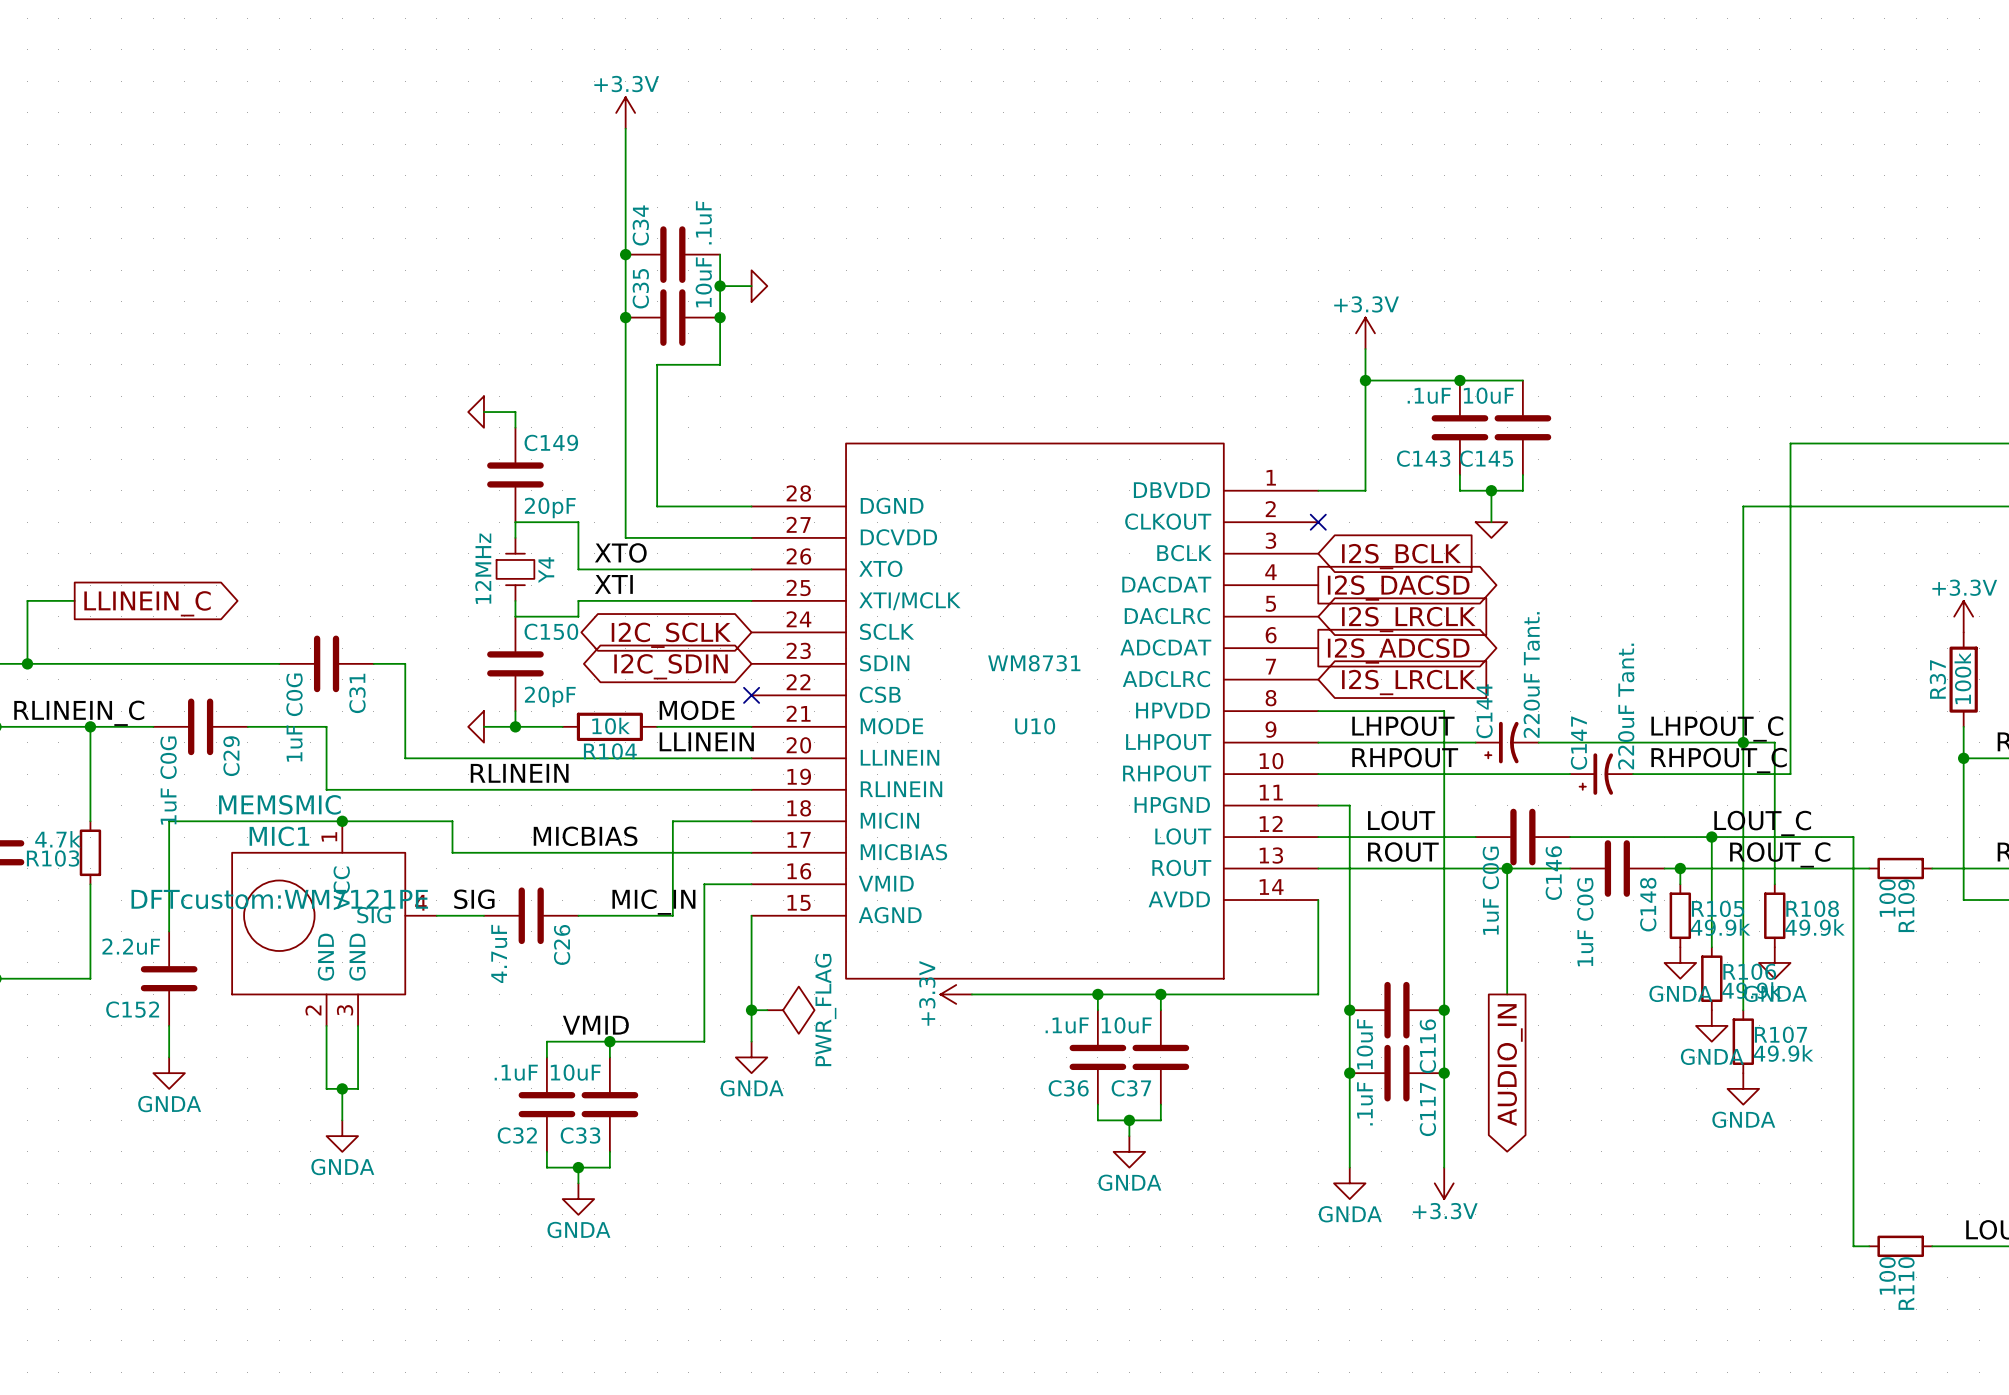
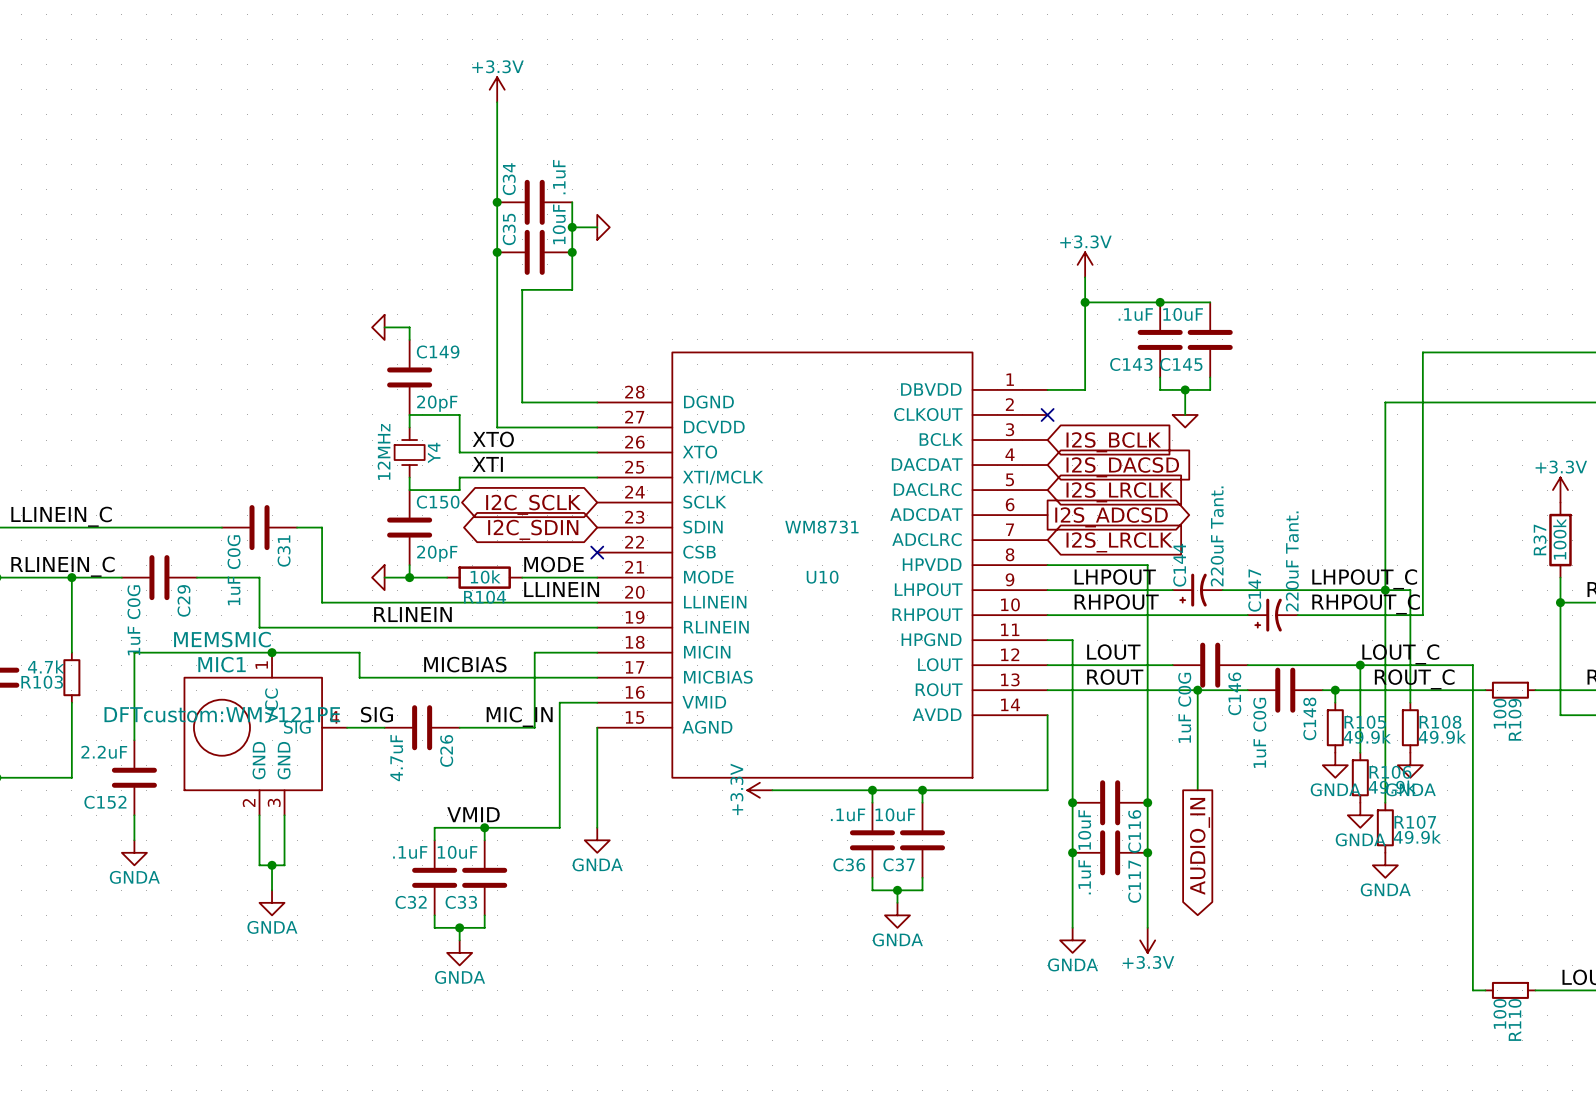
global label shape: output (1398, 588) -> input (1122, 467)
wire: (74, 600) (27, 600) (27, 663) -> none
global label: LLINEIN_C (147, 603) -> none
label: none -> LLINEIN_C (61, 516)
junction: (27, 663) -> none
wire: (751, 1010) (767, 1010) -> none
junction: (751, 1010) -> none
power symbol: PWR_FLAG (790, 1010) -> none

